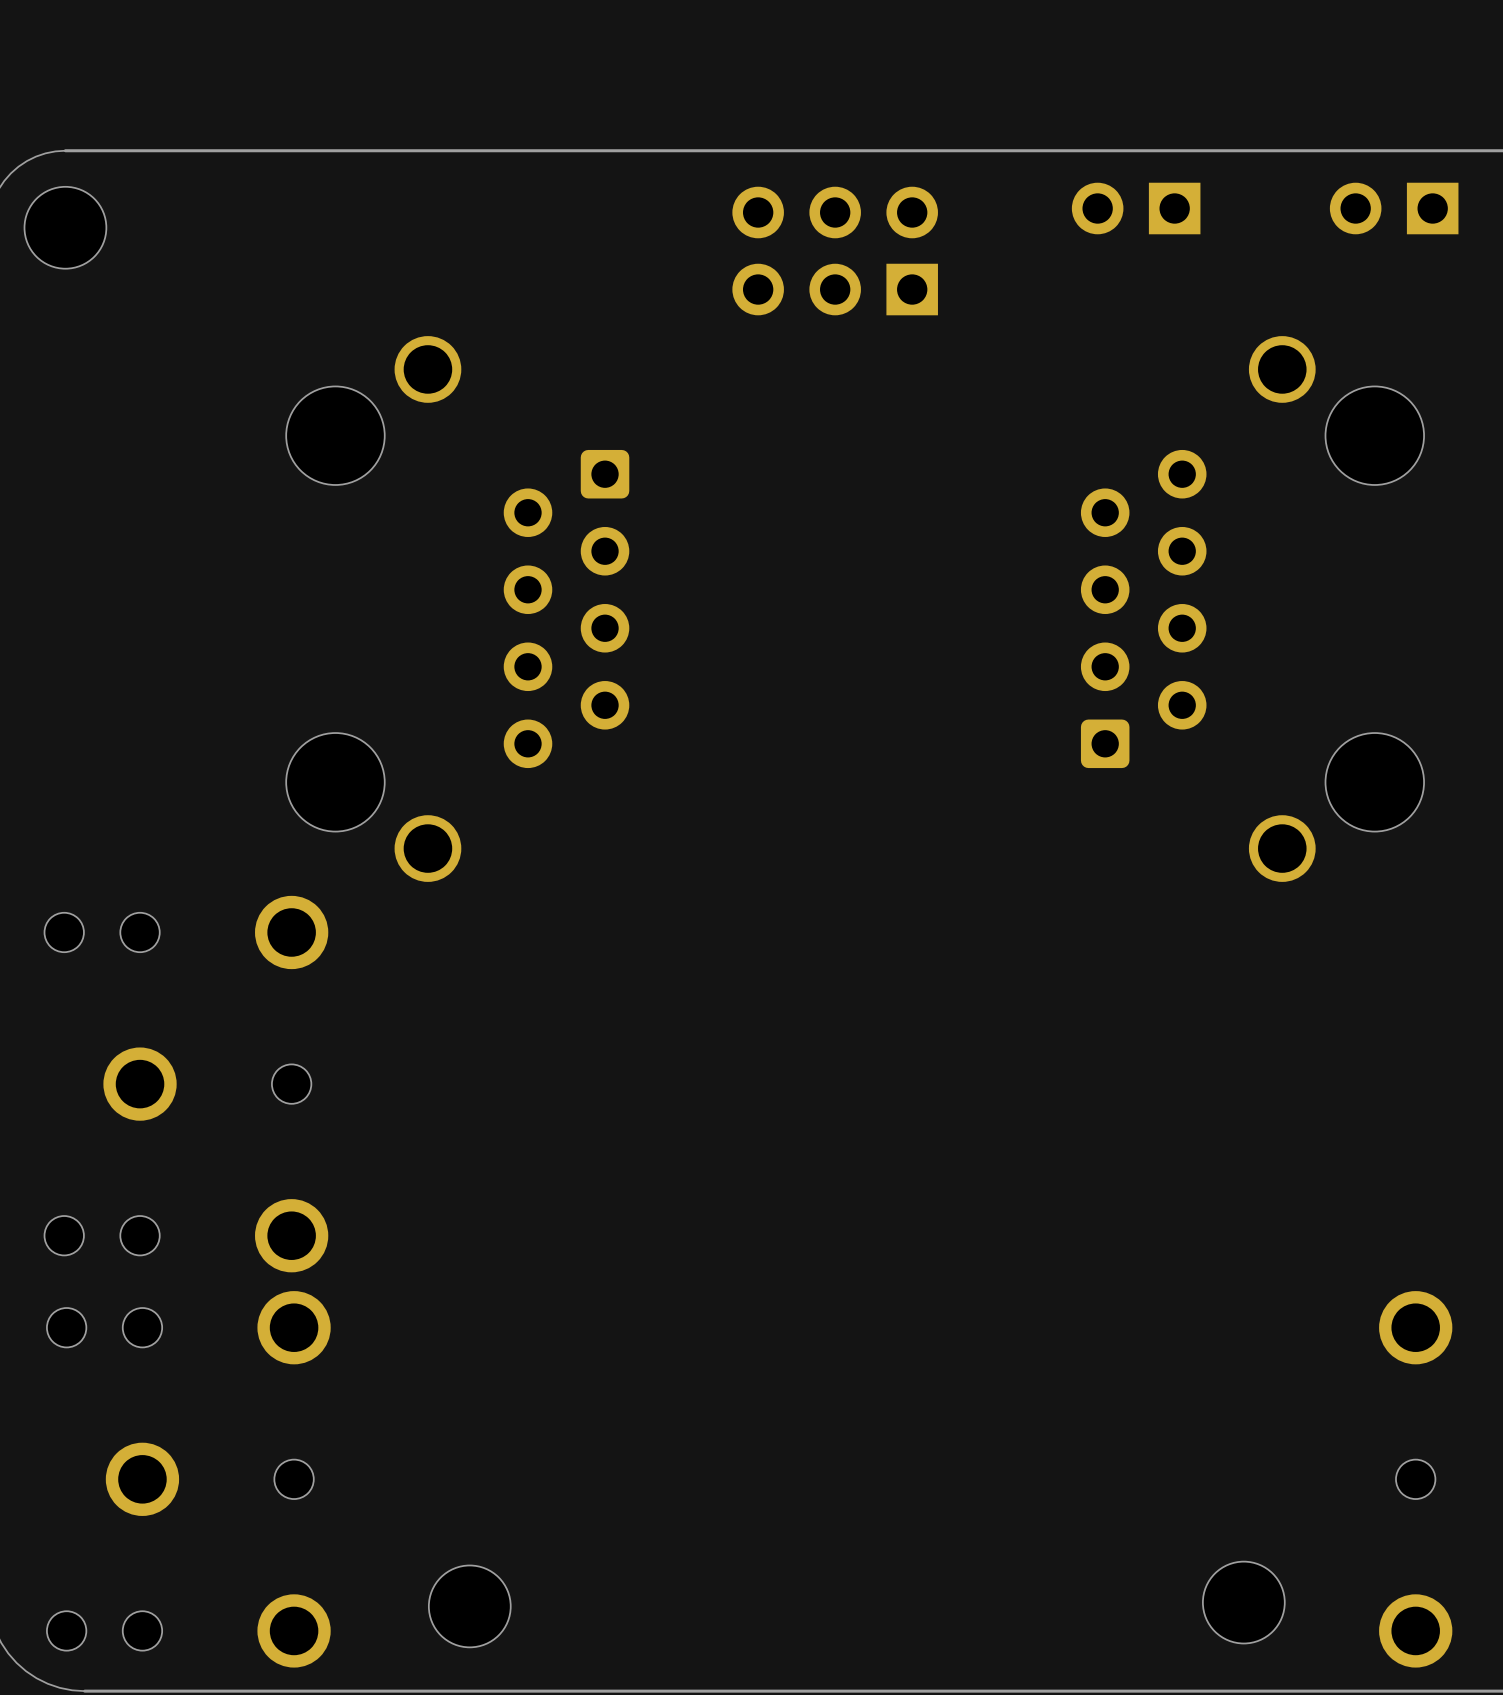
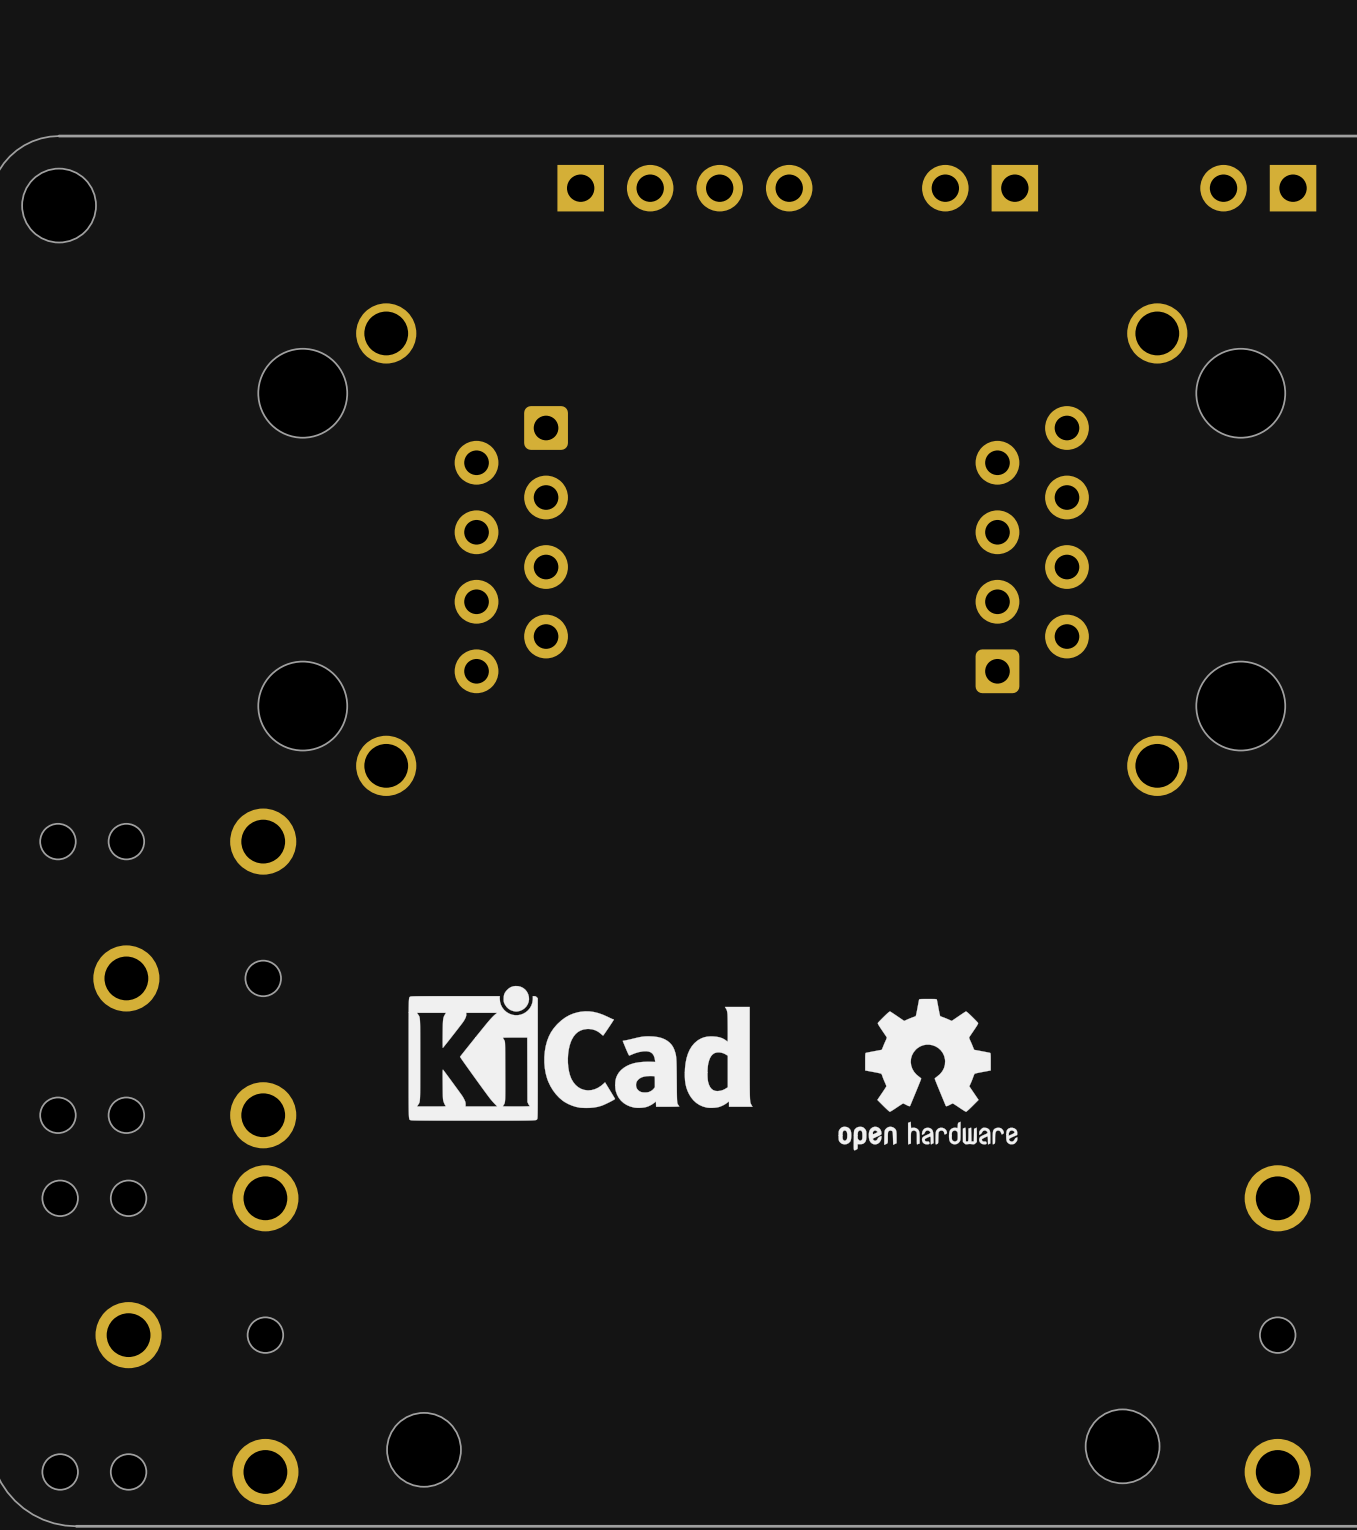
part: none -> (684, 188)
part position: (1136, 208) -> (980, 188)
part: (835, 251) -> none
drawing: none -> [408, 985, 753, 1121]
drawing: none -> [838, 998, 1018, 1151]

